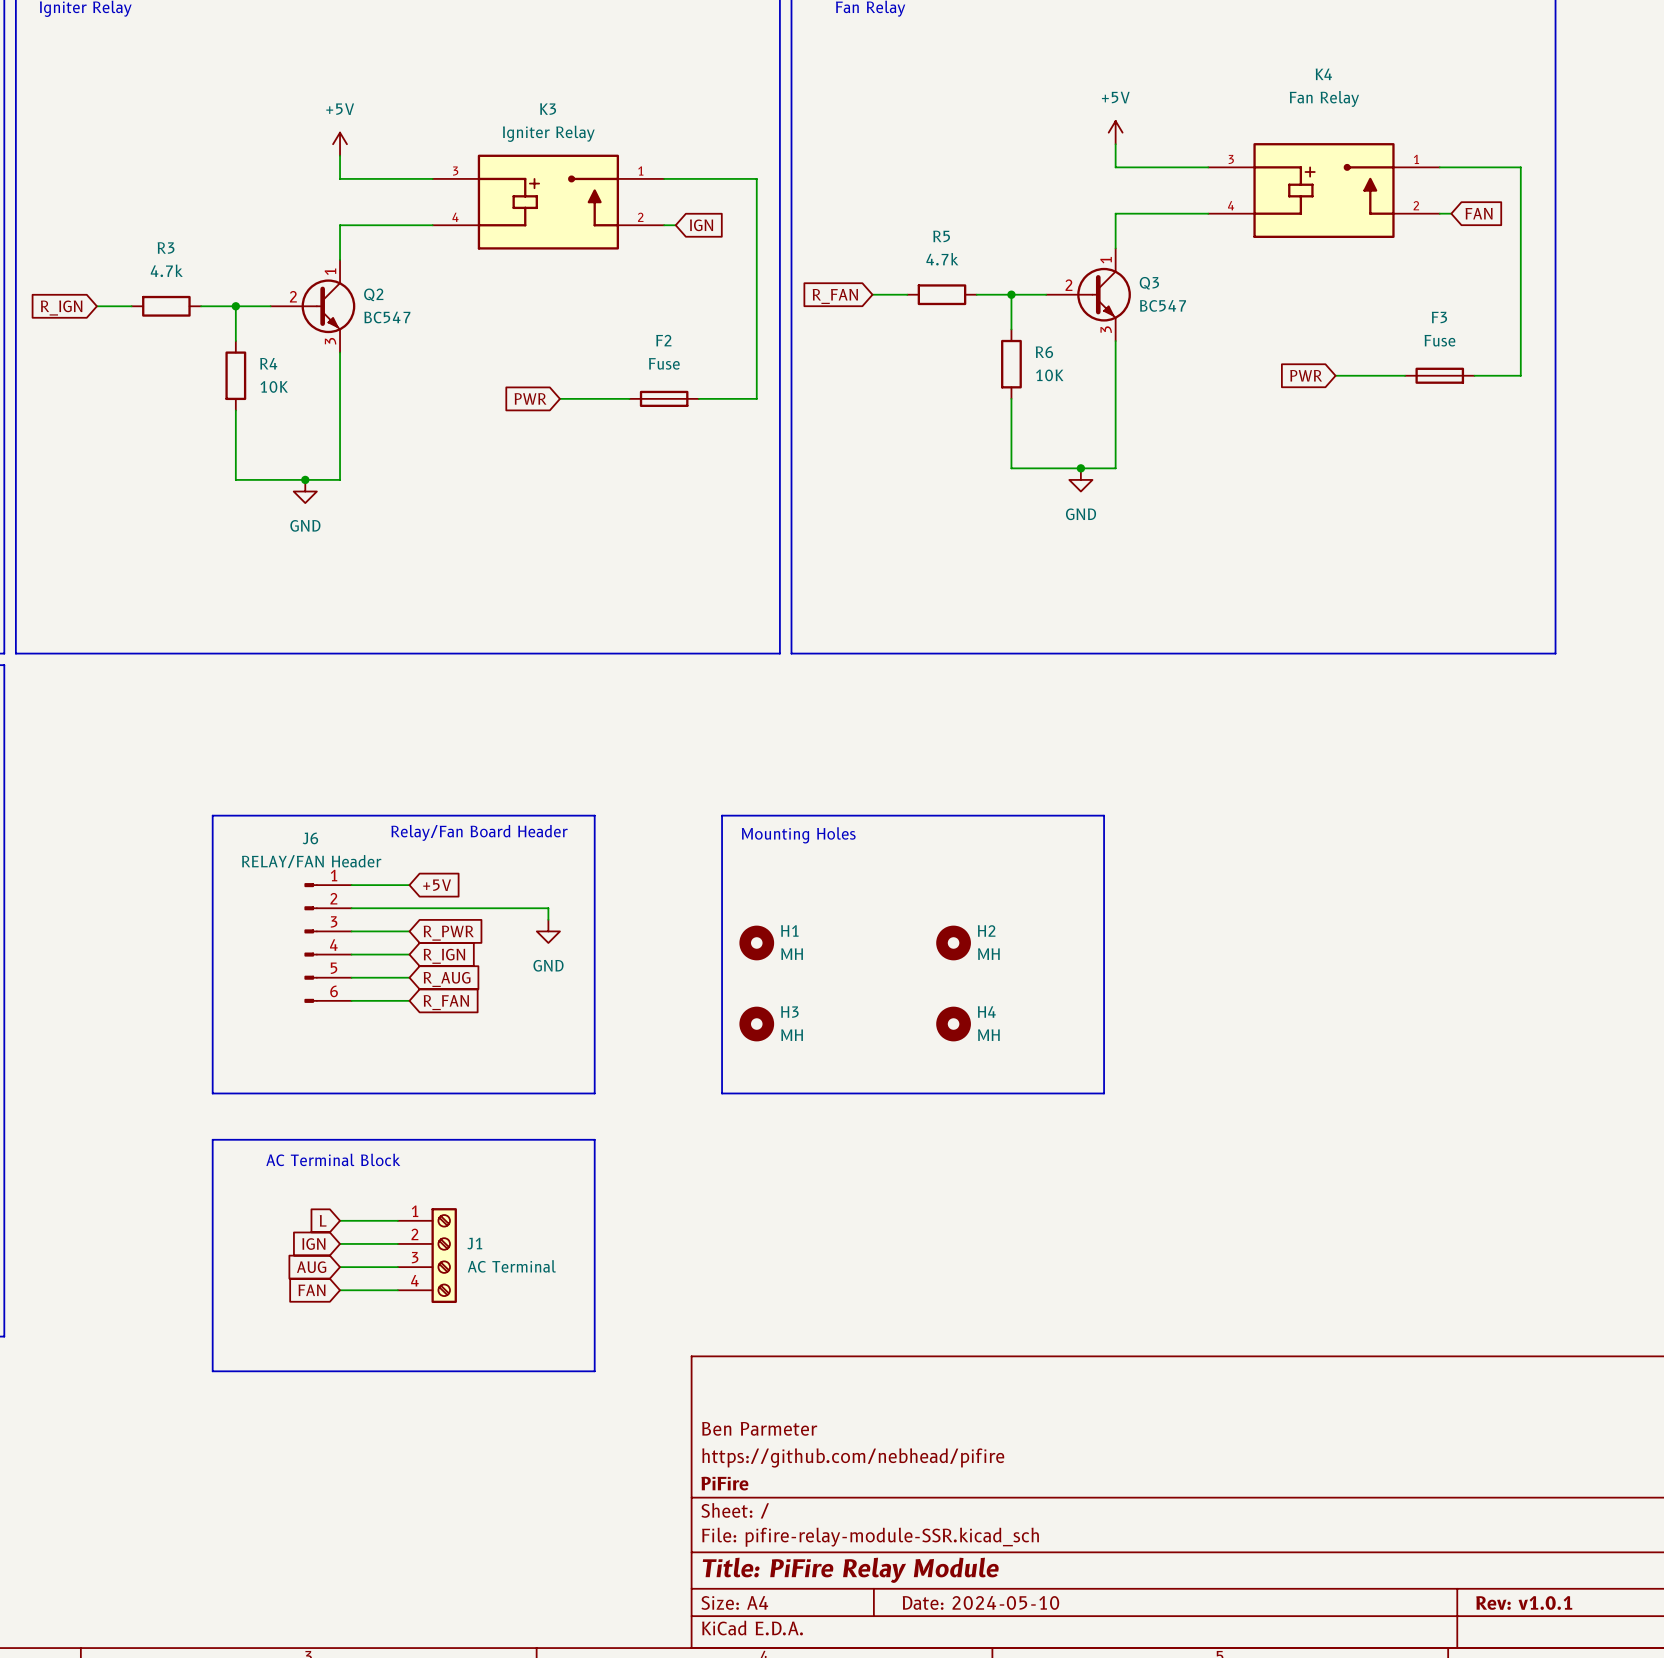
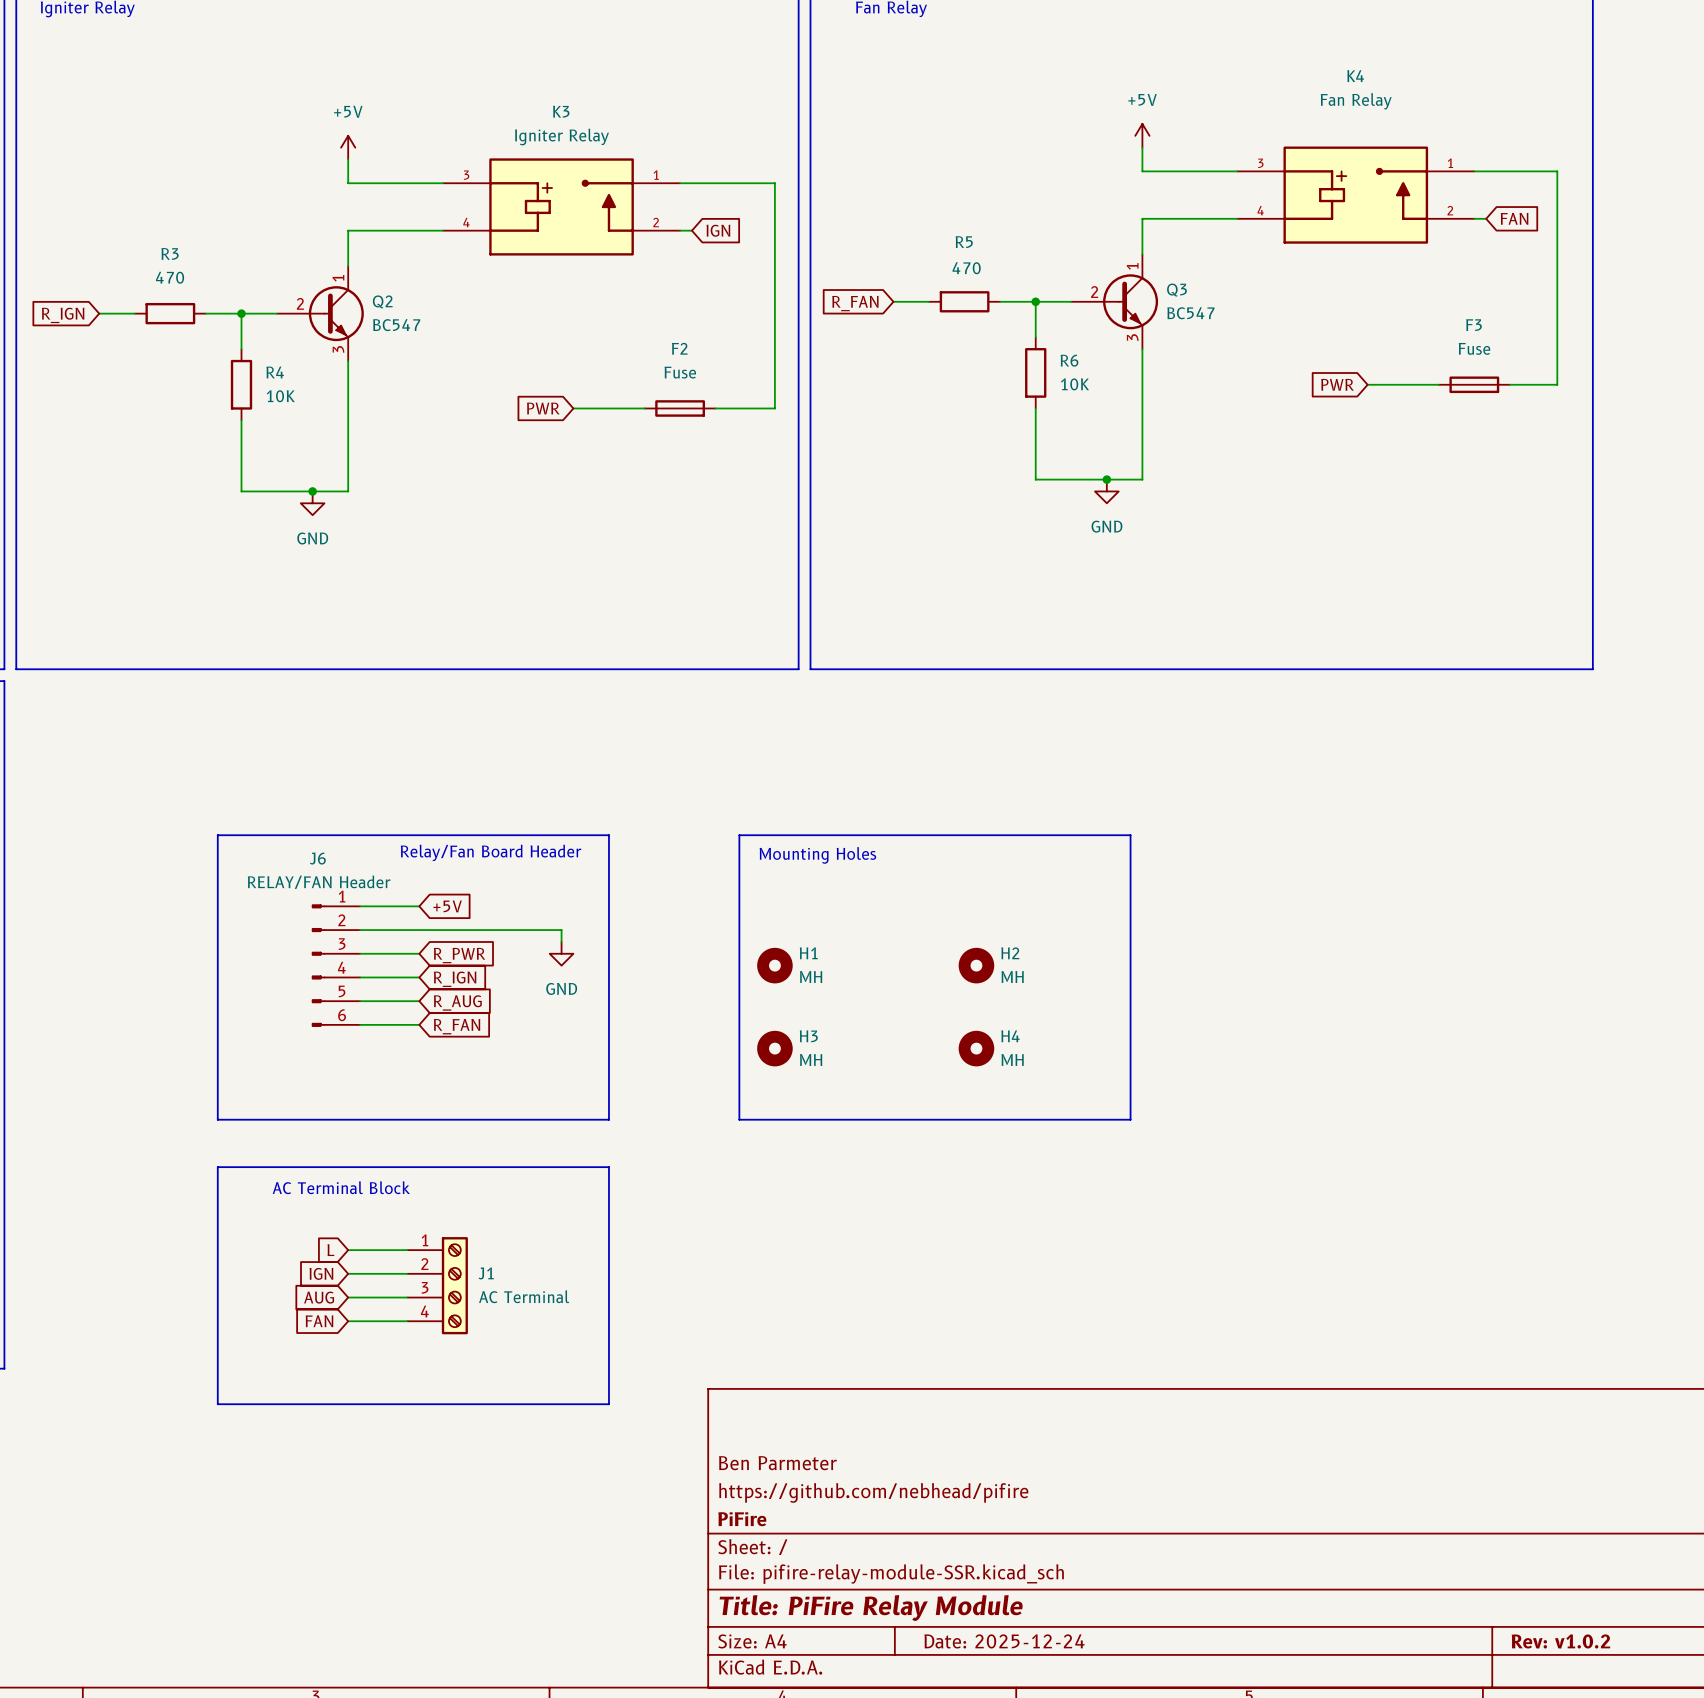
R5 value: 4.7k (942, 259) -> 470 (966, 268)
R3 value: 4.7k (166, 270) -> 470 (170, 277)
title block: Date: 2024-05-10 (980, 1602) -> Date: 2025-12-24 (1004, 1641)
title block: Rev: v1.0.1 (1524, 1602) -> Rev: v1.0.2 (1560, 1641)

